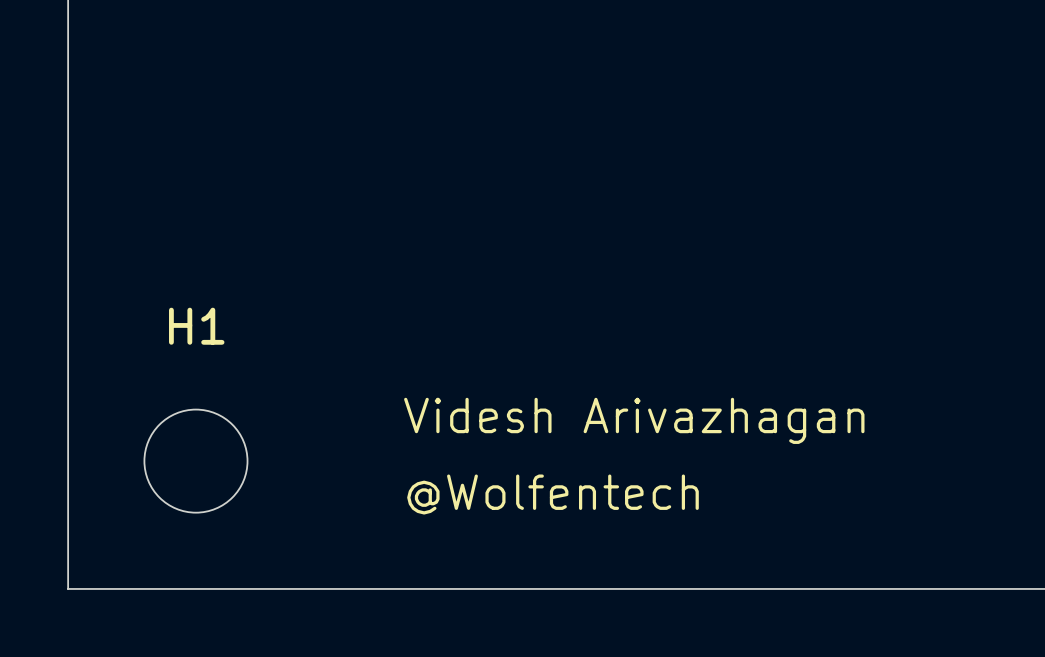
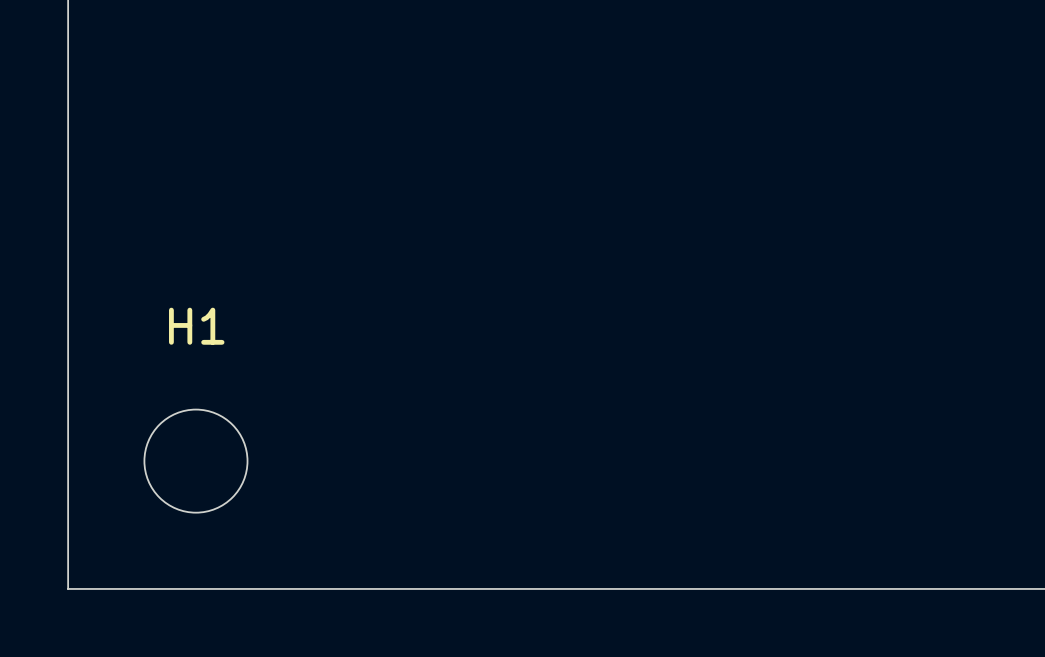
text: Videsh Arivazhagan (634, 420) -> none
text: @Wolfentech (552, 494) -> none

